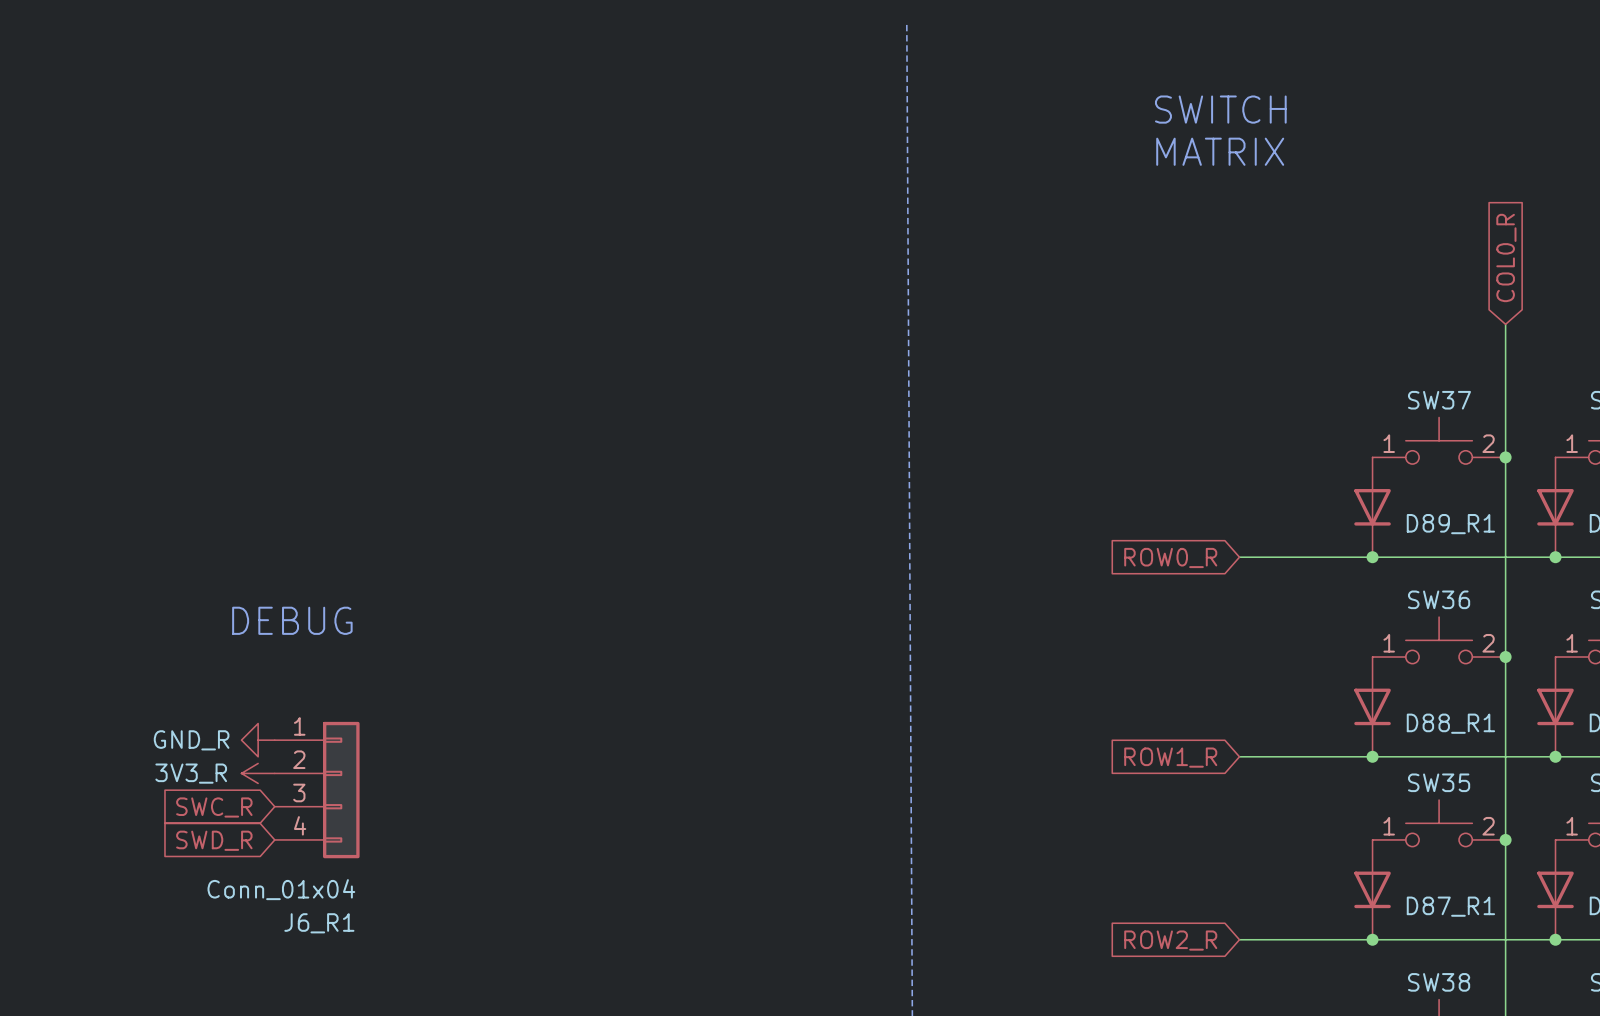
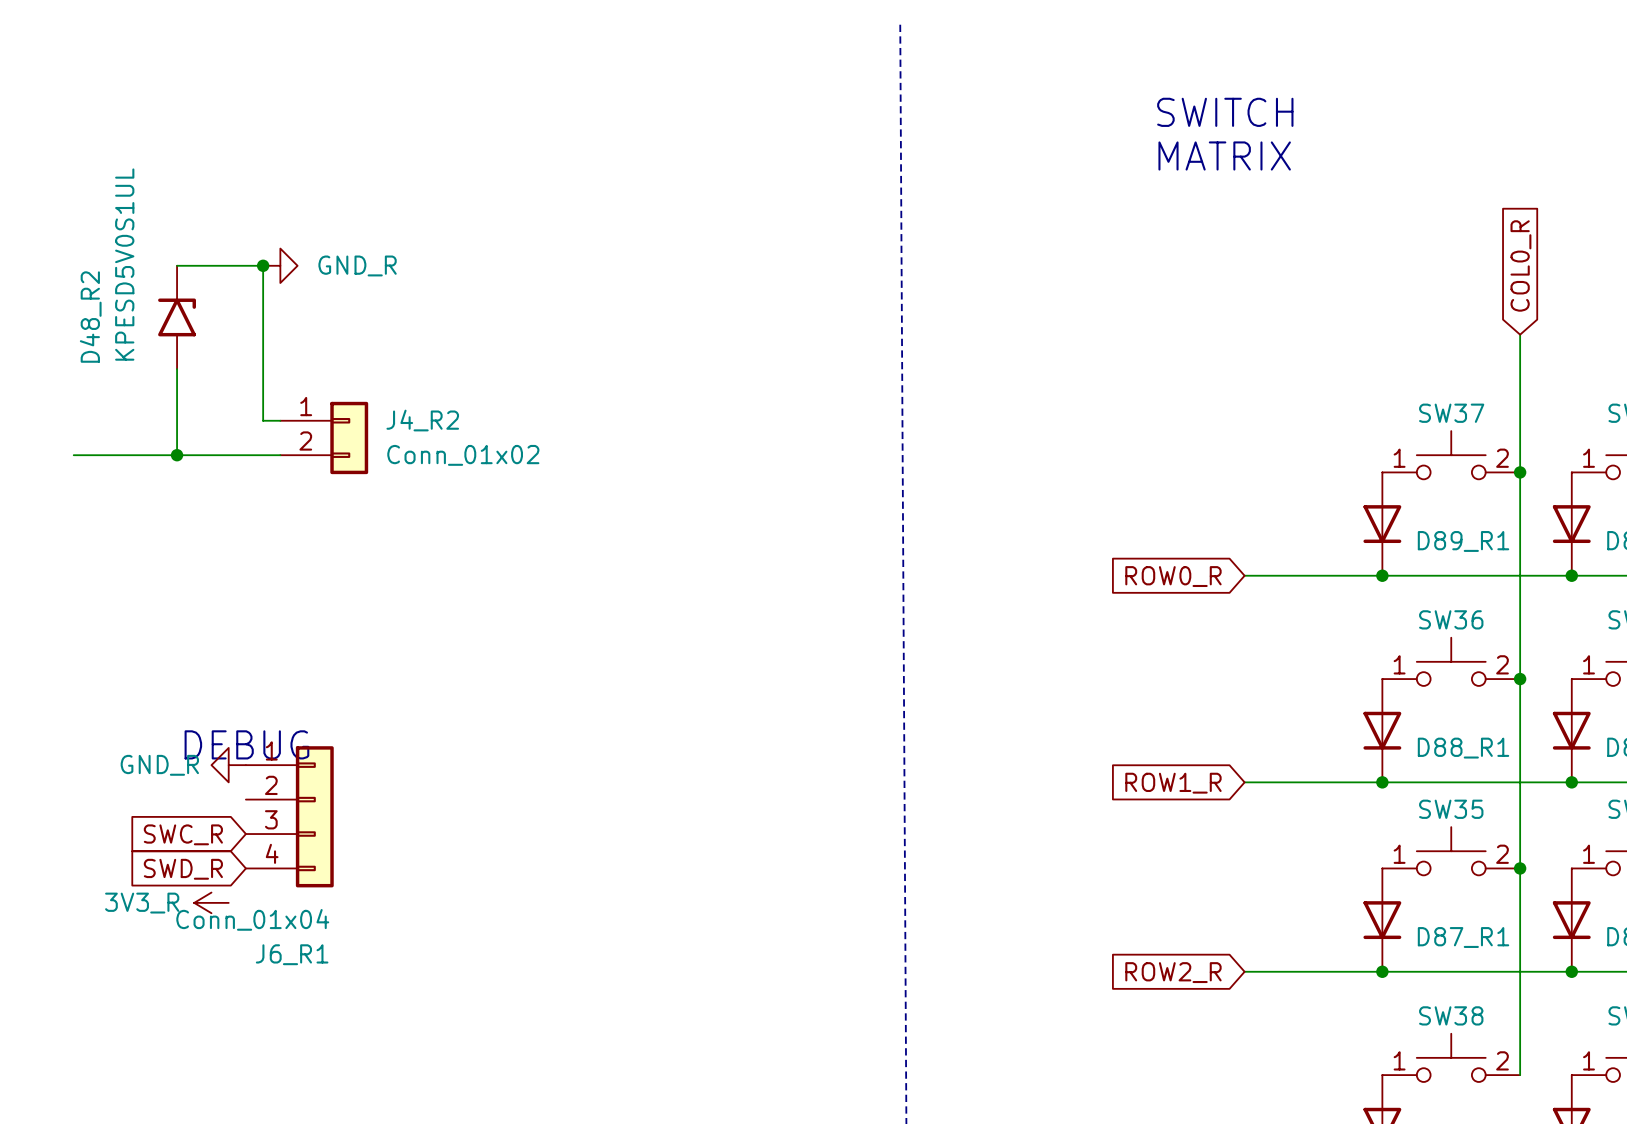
wire: none -> (177, 265) (263, 265) (263, 420) (280, 420)
junction: none -> (263, 265)
power symbol: none -> GND_R (280, 265)
D48_R2: none -> KPESD5V0S1UL (177, 317)
wire: none -> (177, 369) (177, 455)
J4_R2: none -> Conn_01x02 (324, 437)
wire: none -> (73, 455) (280, 455)
junction: none -> (177, 455)
text position: DEBUG (292, 620) -> DEBUG (246, 744)
power symbol position: 3V3_R (258, 773) -> 3V3_R (211, 902)

